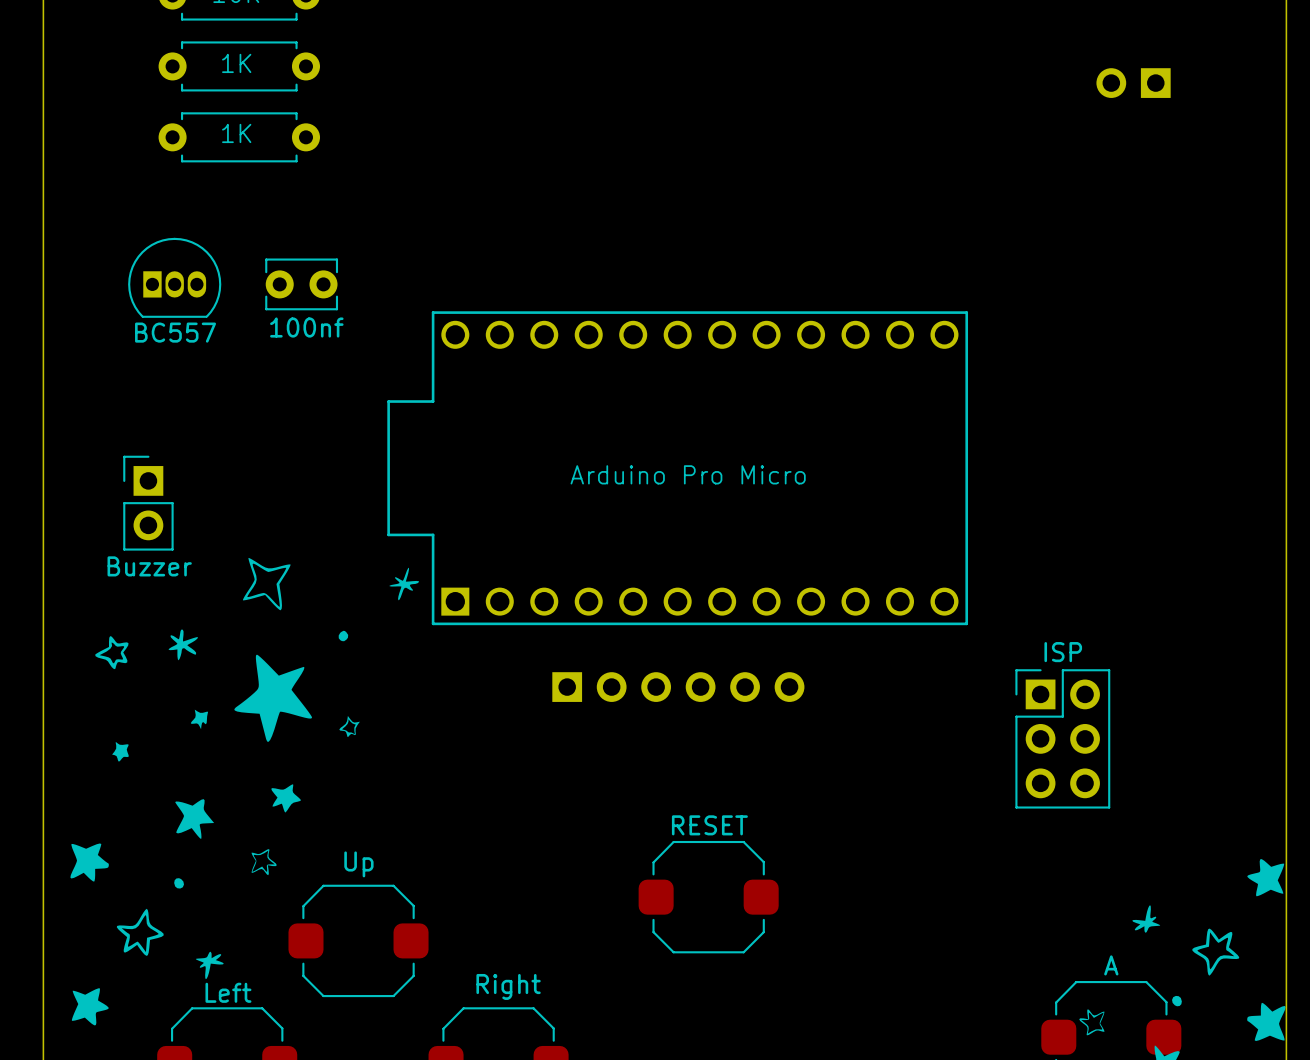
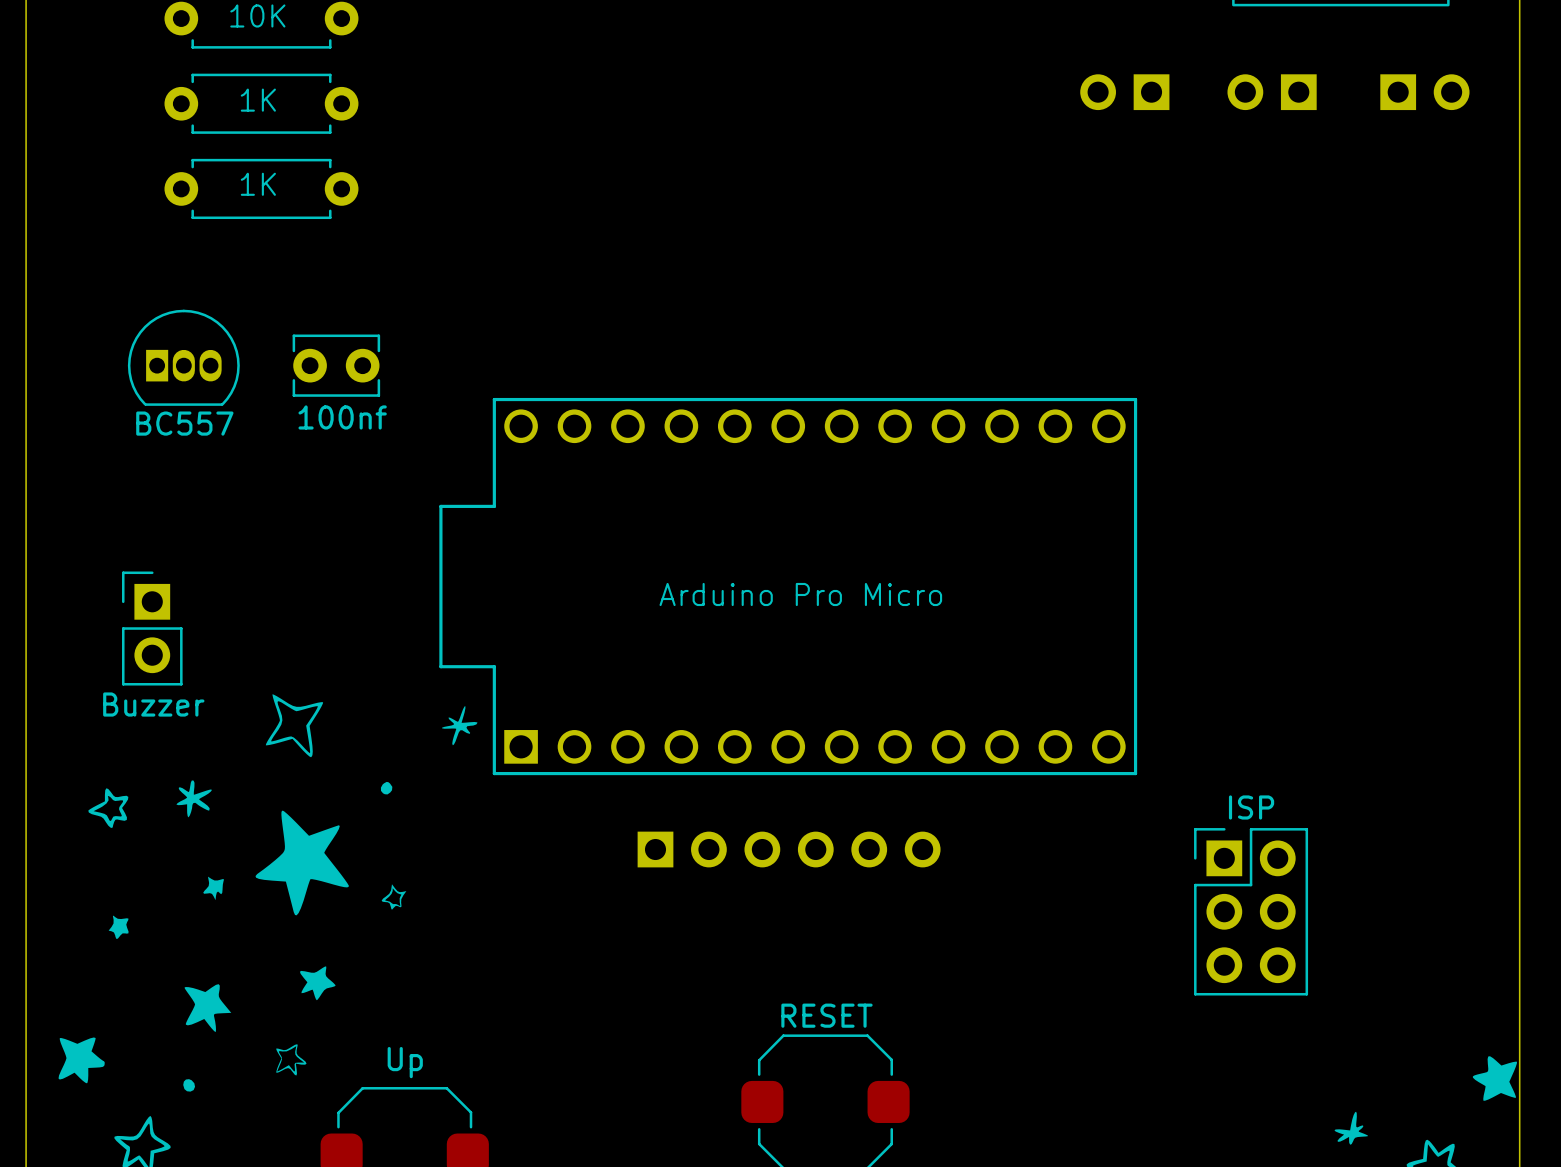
part: none -> (1124, 92)
part: none -> (1272, 92)
part: none -> (1424, 92)
part: (1133, 83) -> none

